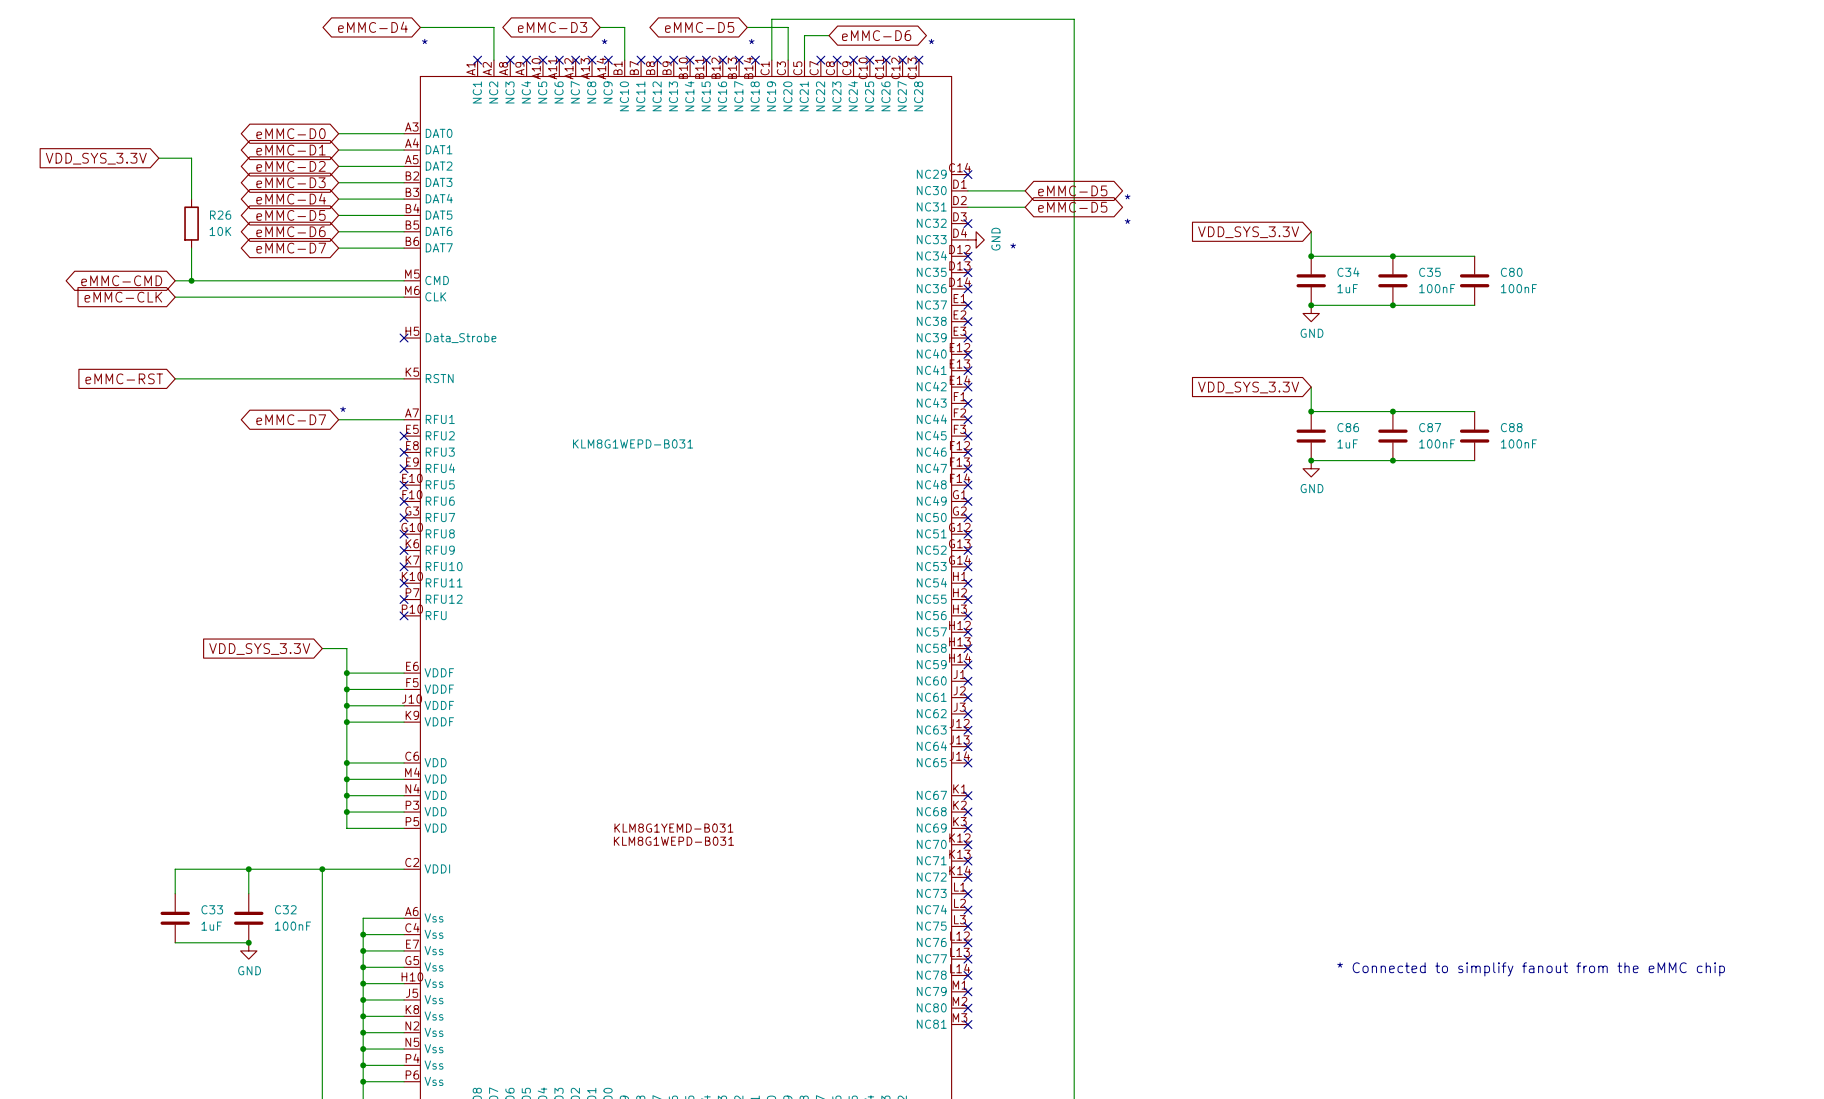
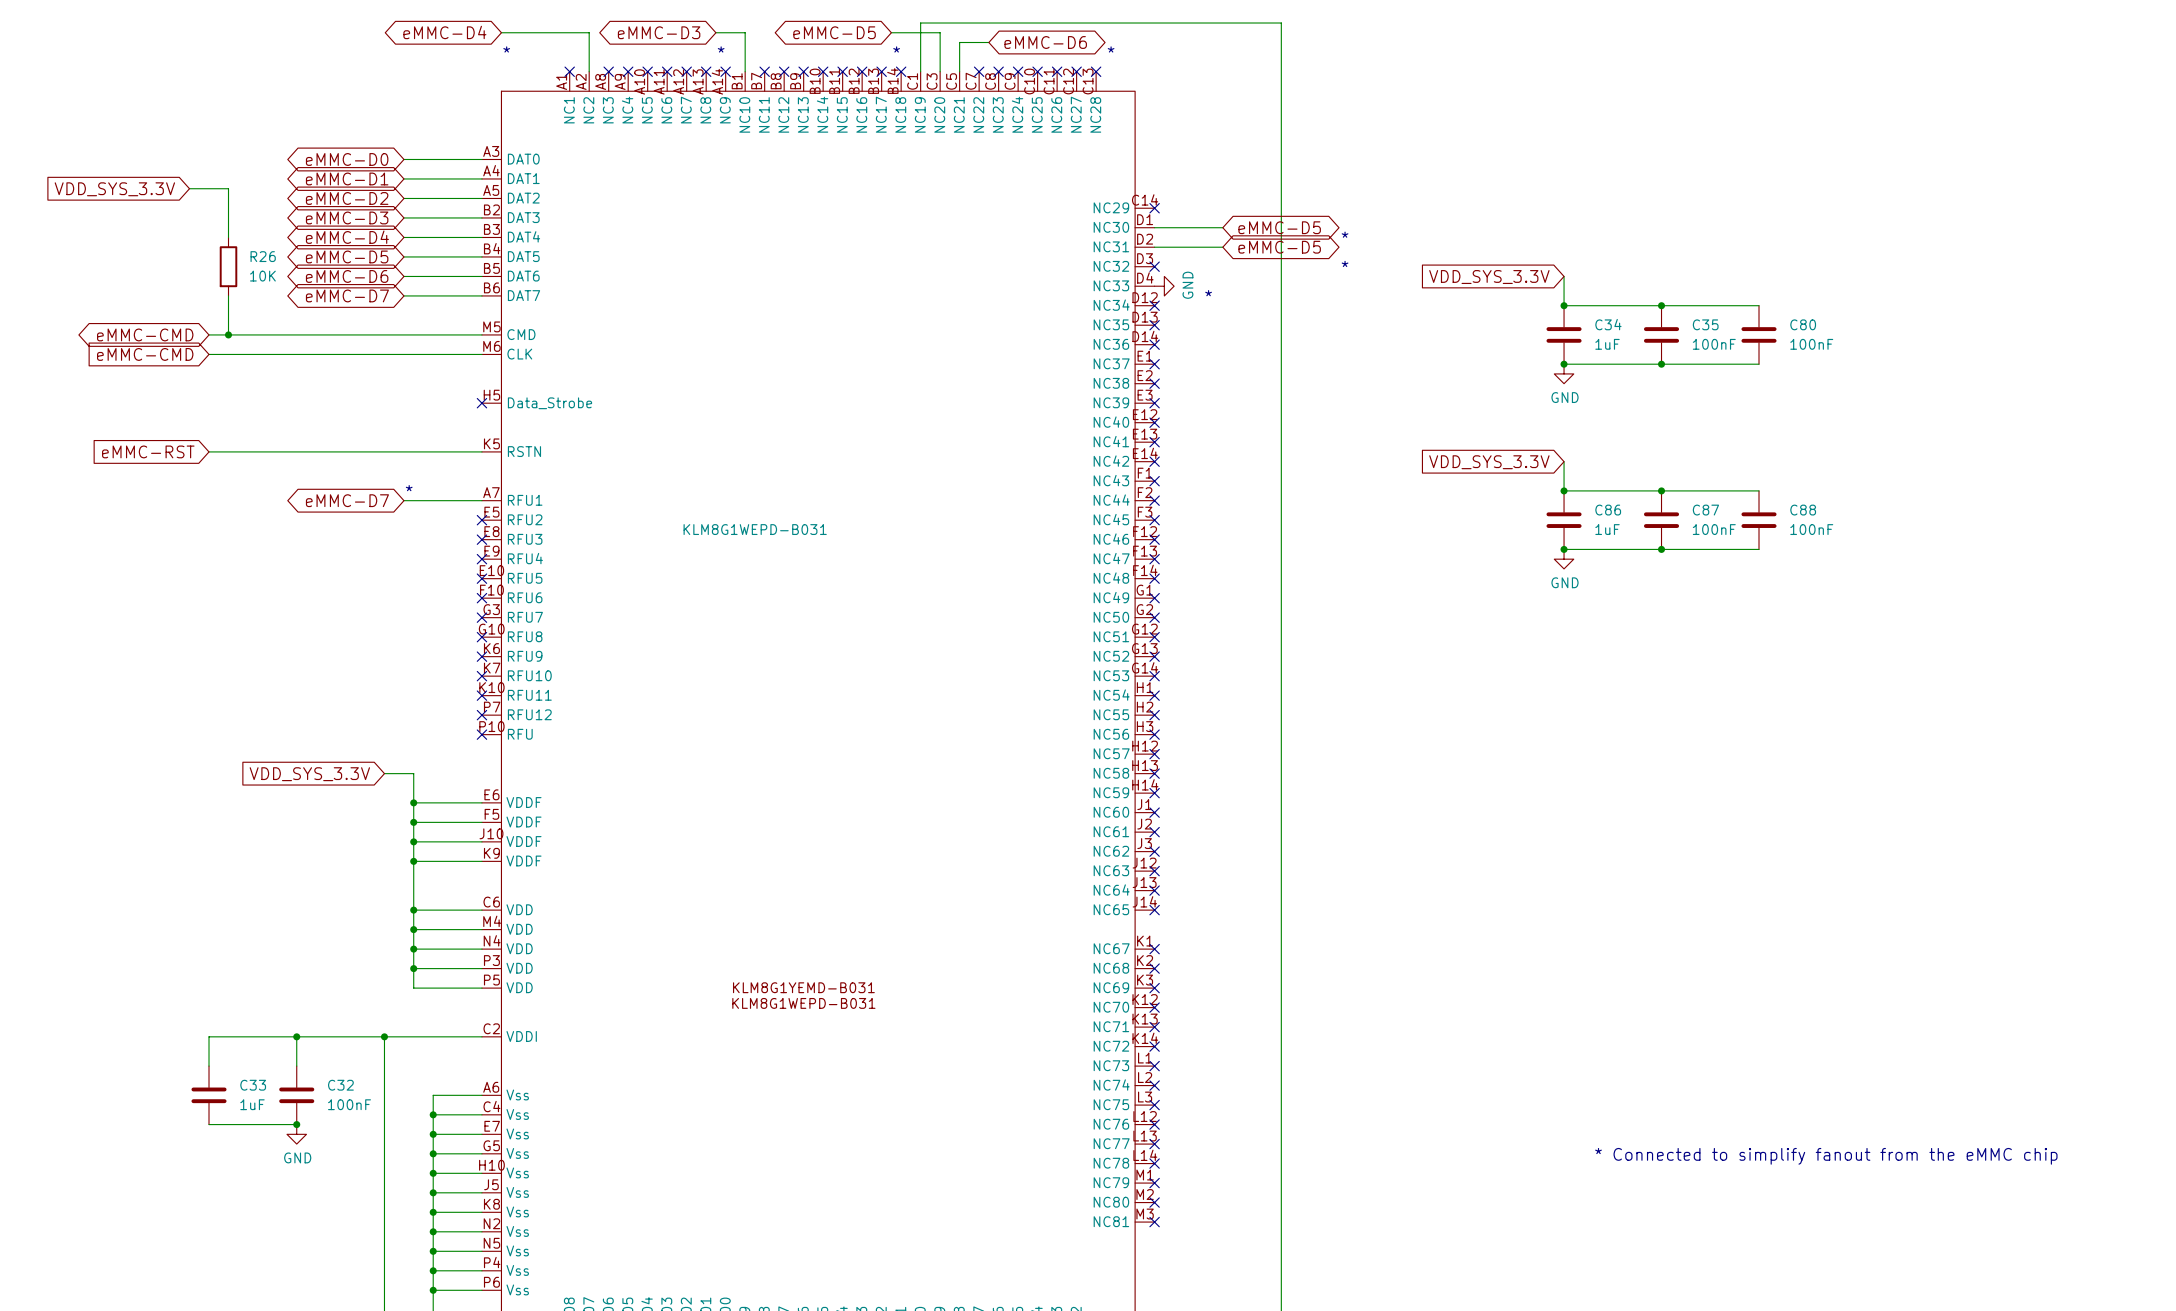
global label: eMMC-CLK (123, 297) -> eMMC-CMD (145, 354)

